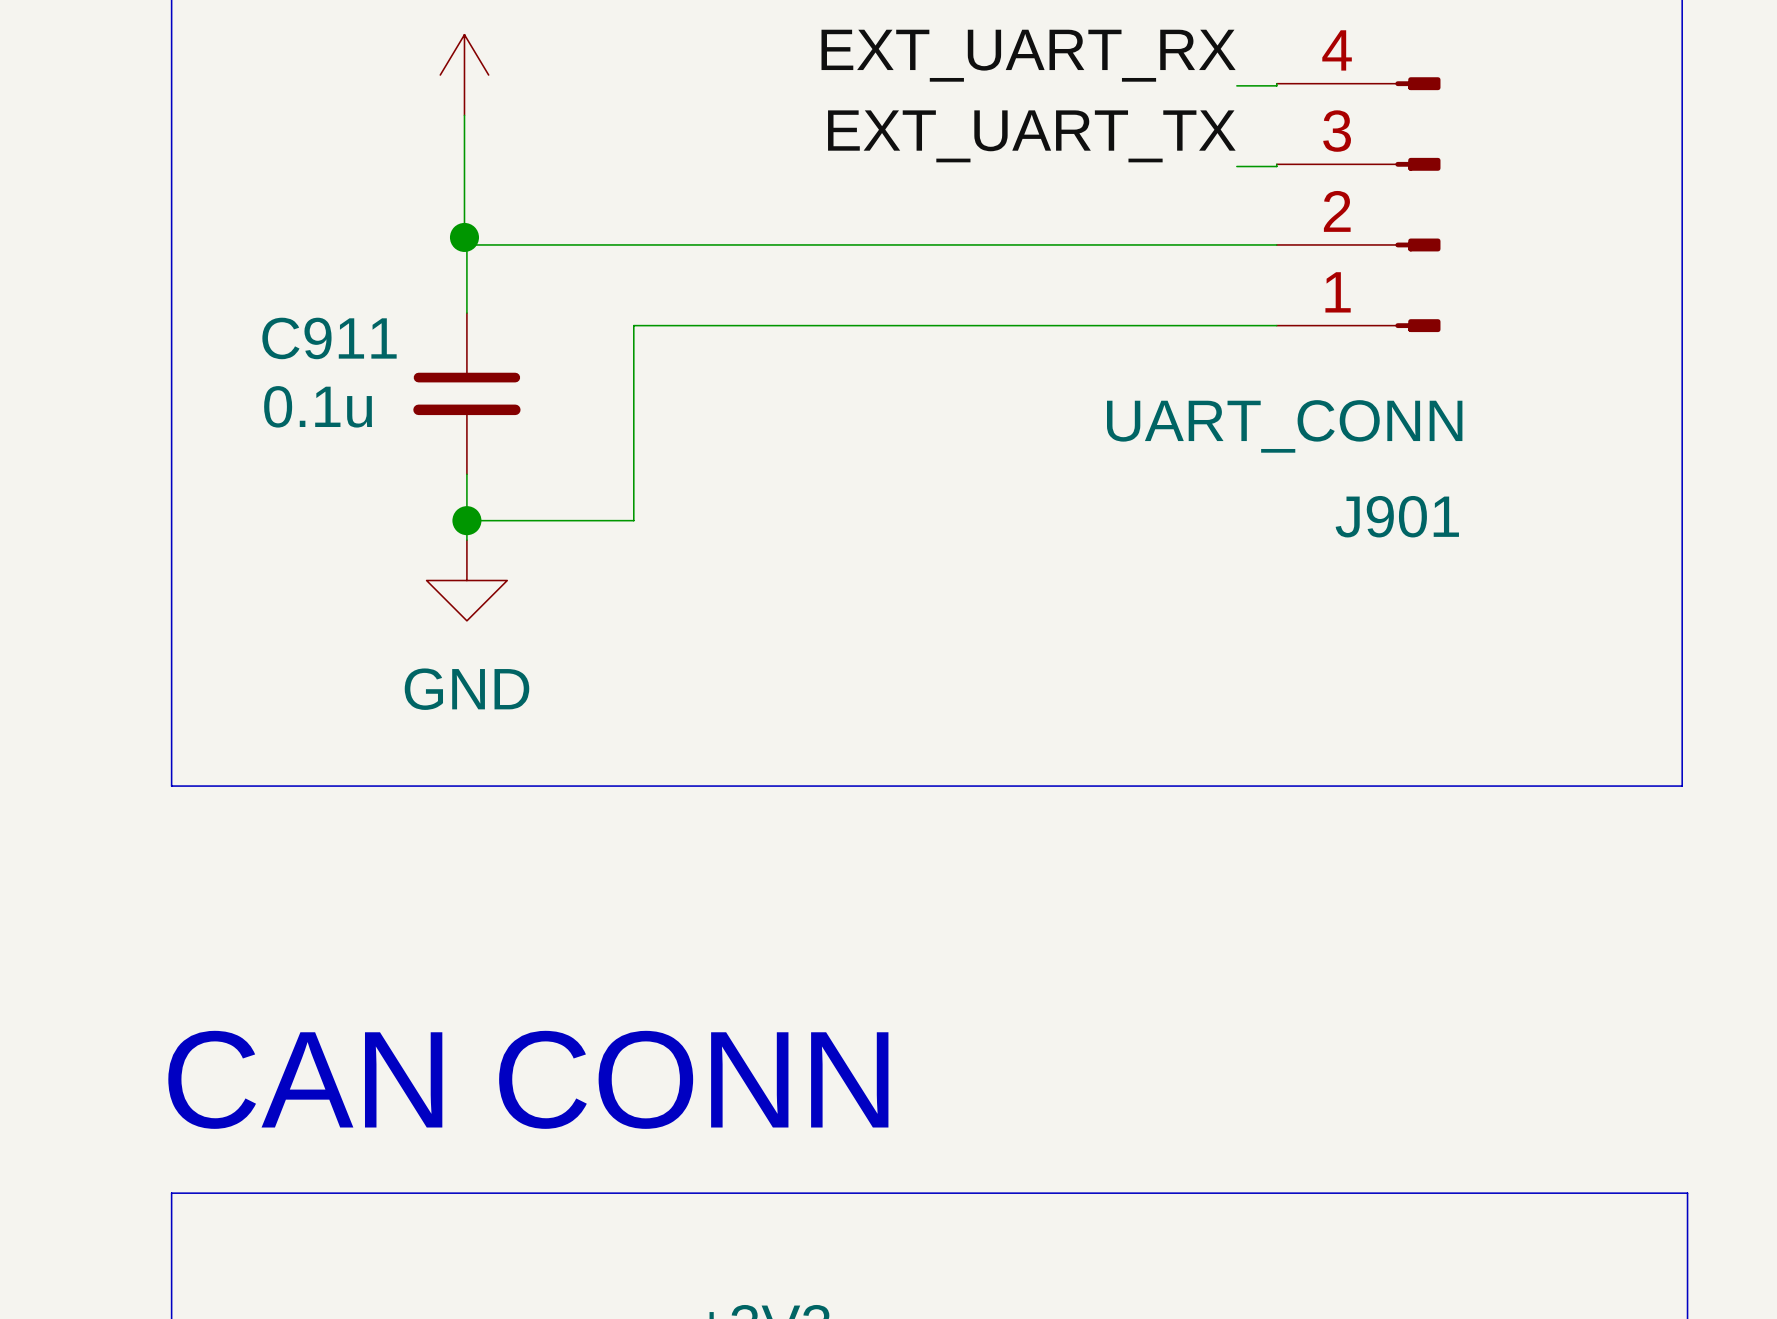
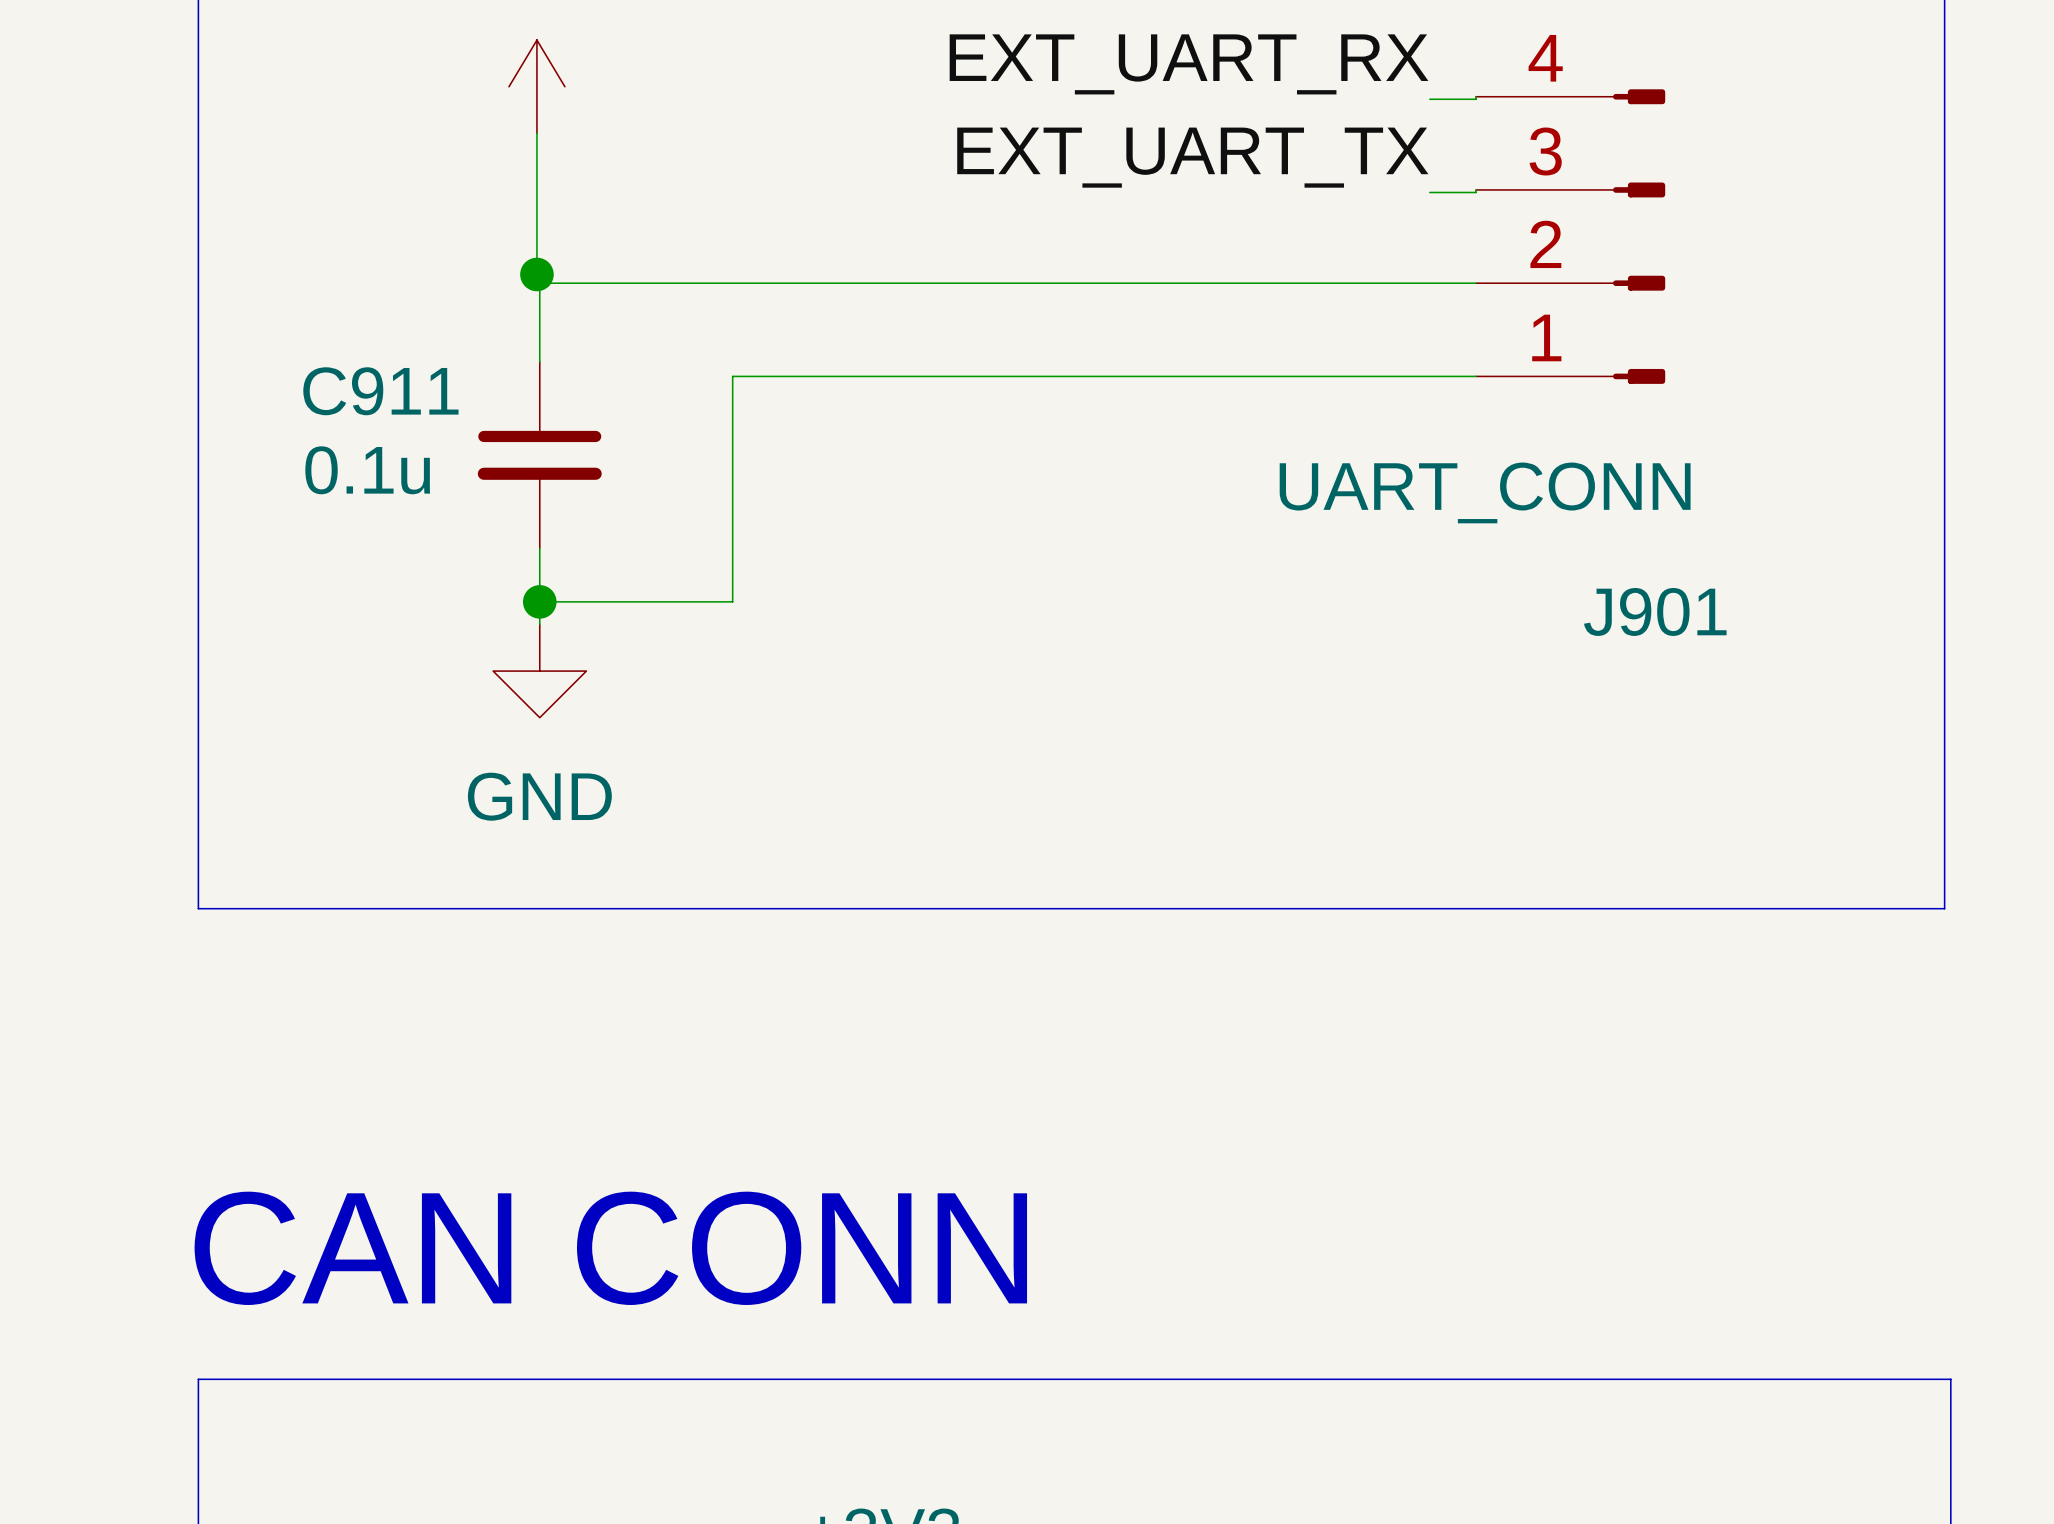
J901 name position: J901 (1397, 516) -> J901 (1655, 611)

